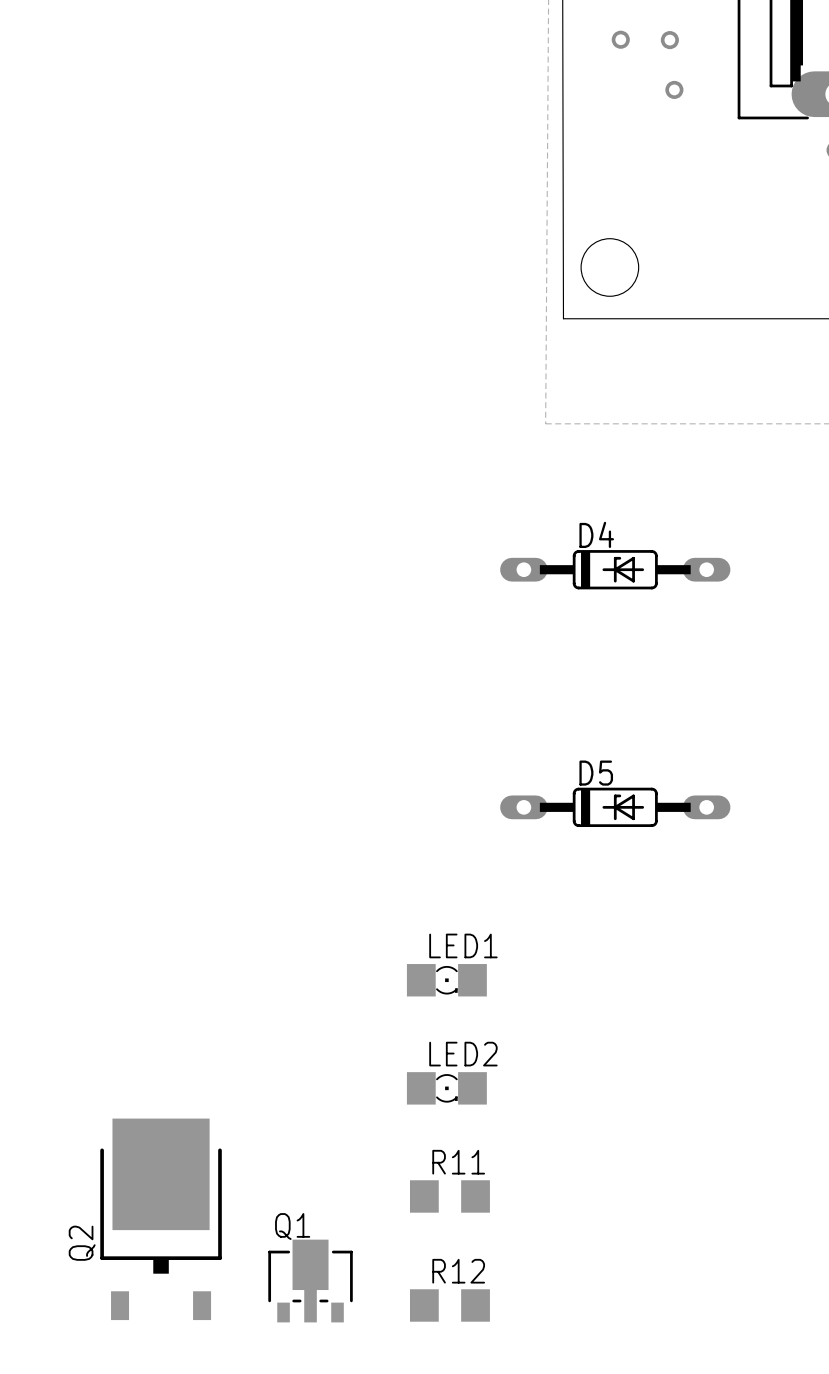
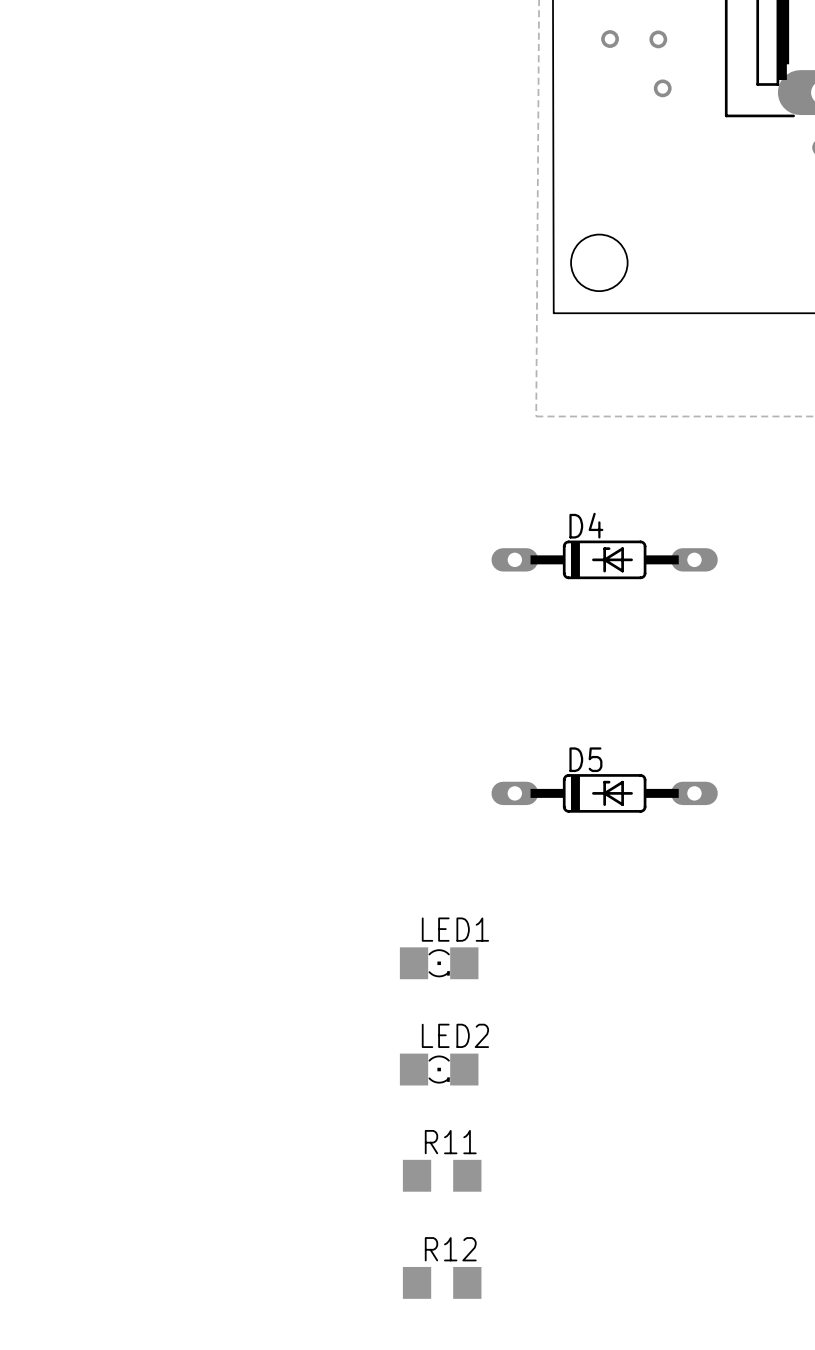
Q2: (161, 1219) -> none
Q1: (310, 1281) -> none

